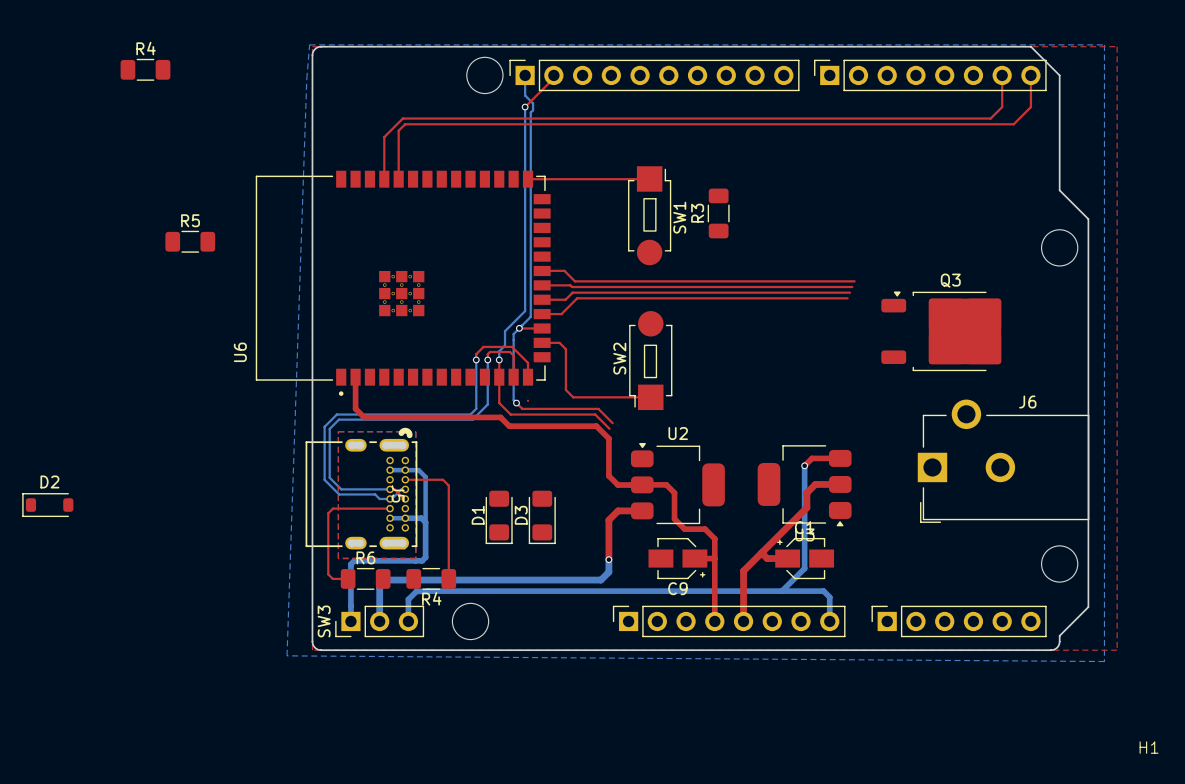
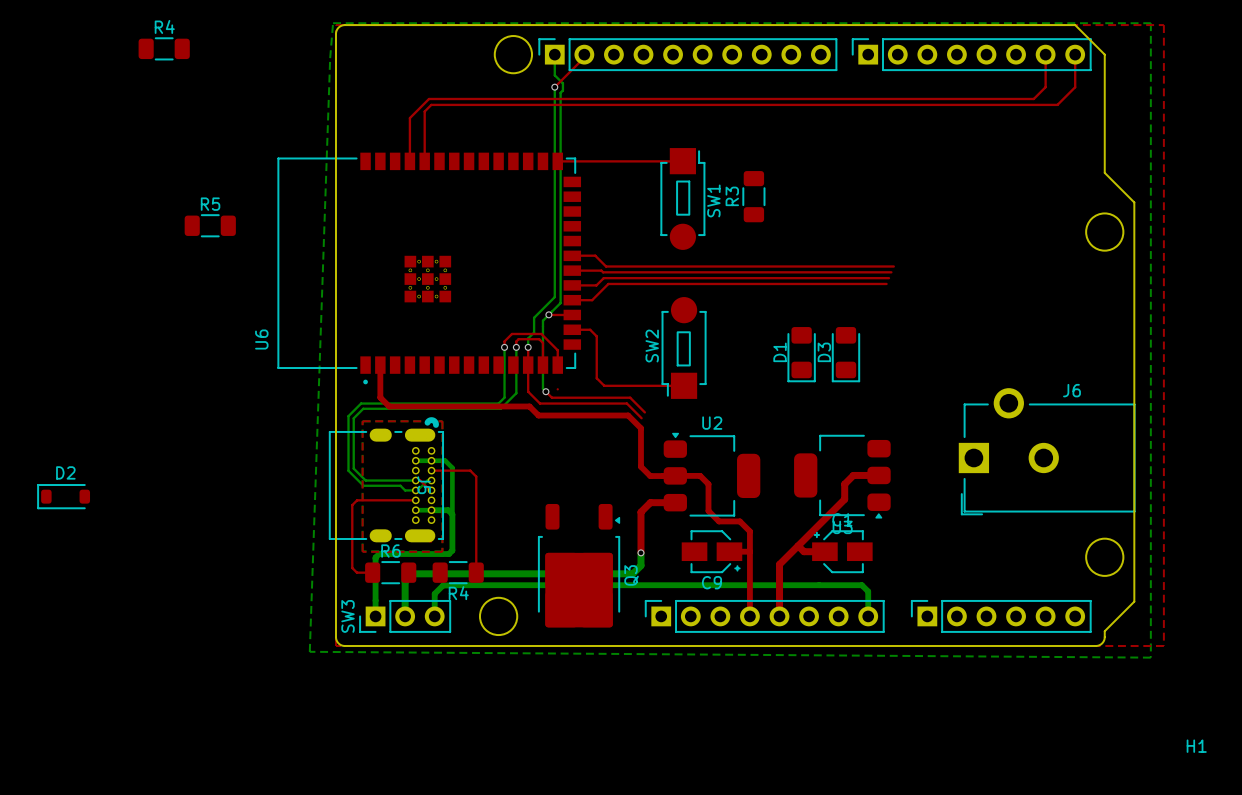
Q3 rotation: 0° (941, 331) -> 90° clockwise (579, 565)
Q3 position: (941, 331) -> (579, 565)
top track: (840, 458) (811, 458) (804, 465) -> none
bottom track: (804, 465) (804, 568) (782, 591) -> none
via: (804, 465) -> none
D1 position: (499, 517) -> (801, 354)
D3 position: (542, 517) -> (845, 354)

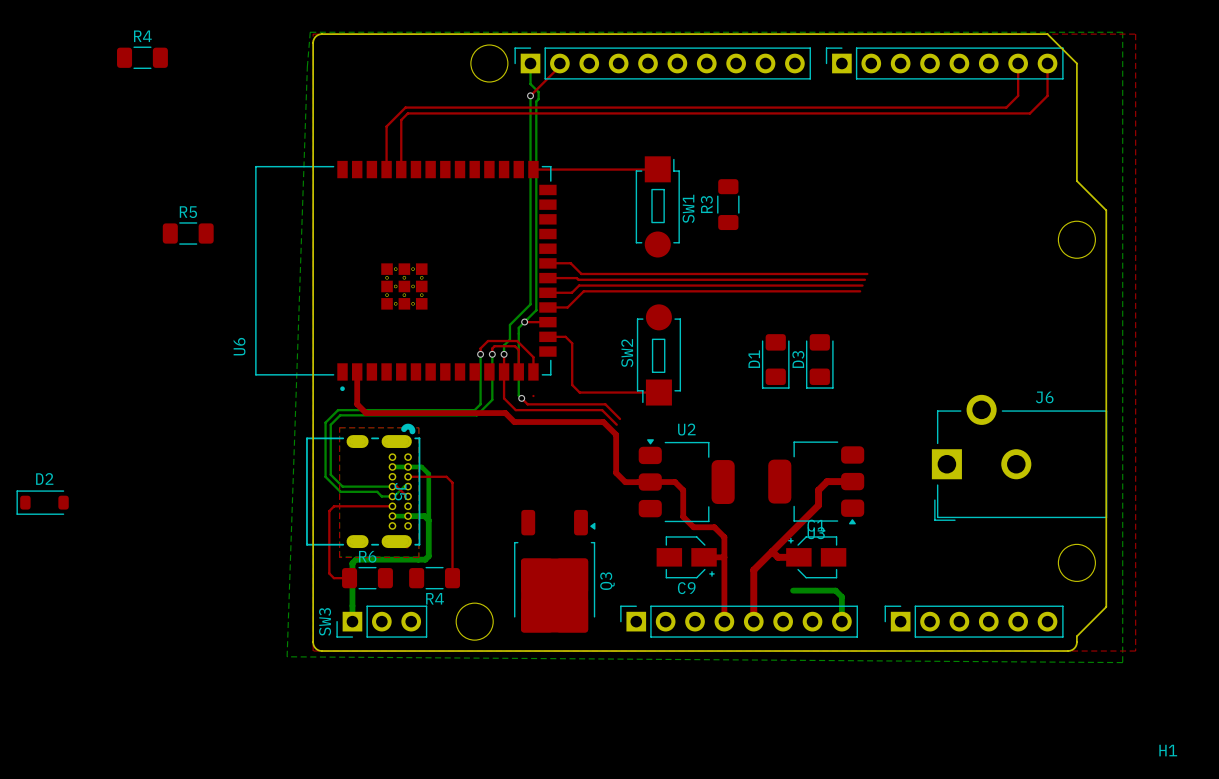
top track: (675, 502) (650, 502) (640, 512) (640, 552) -> none
bottom track: (640, 552) (640, 565) (632, 573) (412, 573) (405, 581) (405, 616) -> none
via: (640, 552) -> none
bottom track: (819, 585) (443, 585) (434, 593) (434, 616) -> none

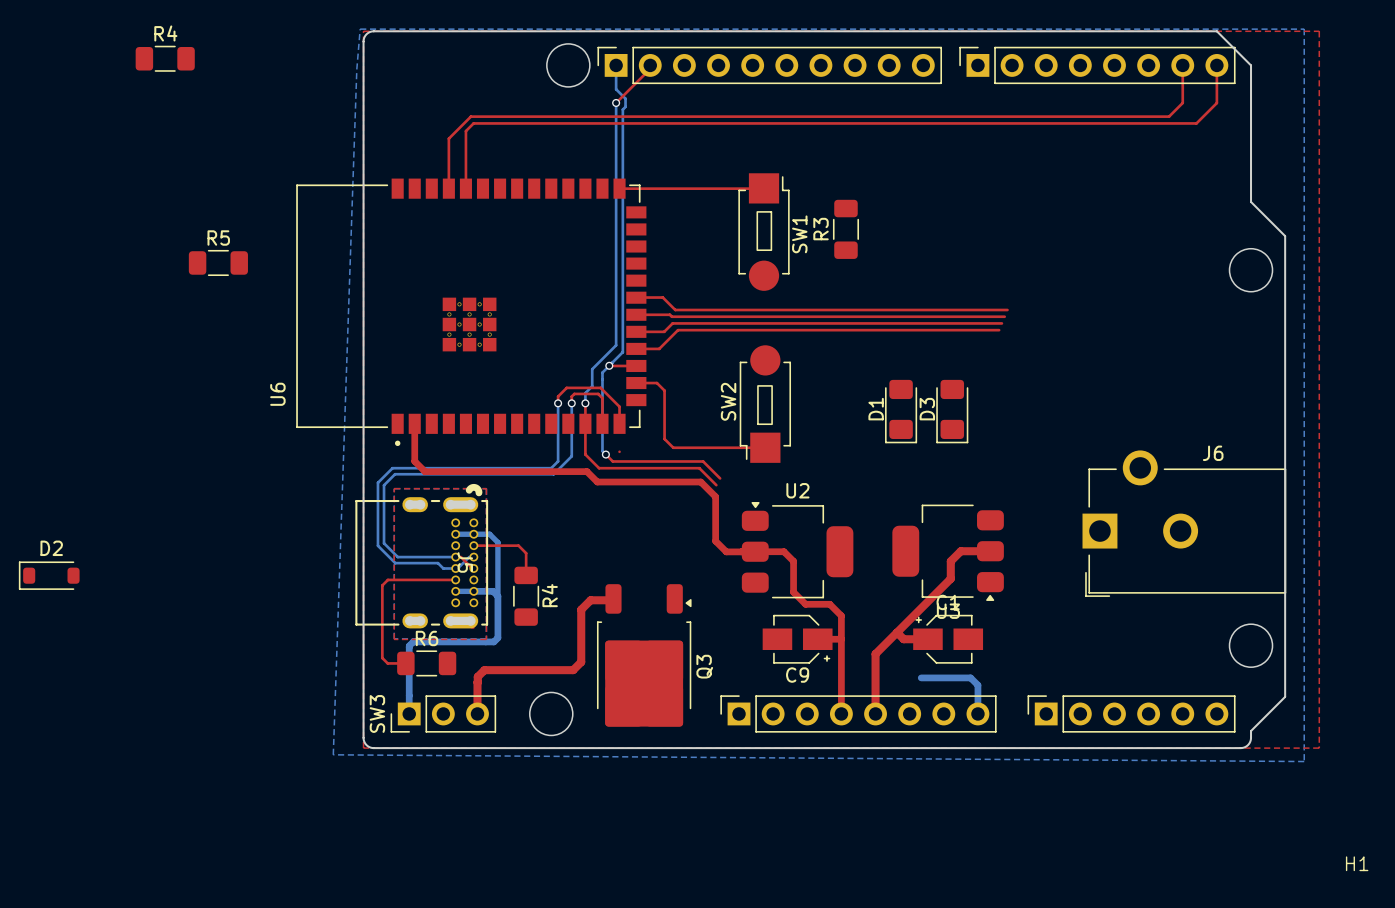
top track: (452, 482) (452, 578) -> (525, 552) (526, 575)
top track: none -> (613, 600) (590, 600) (581, 609) (581, 662) (573, 670) (484, 670) (477, 676) (477, 713)
R4 rotation: 0° (434, 578) -> 90° clockwise (526, 596)
R4 position: (434, 578) -> (526, 596)
R4 name position: R4 (435, 598) -> R4 (549, 595)

